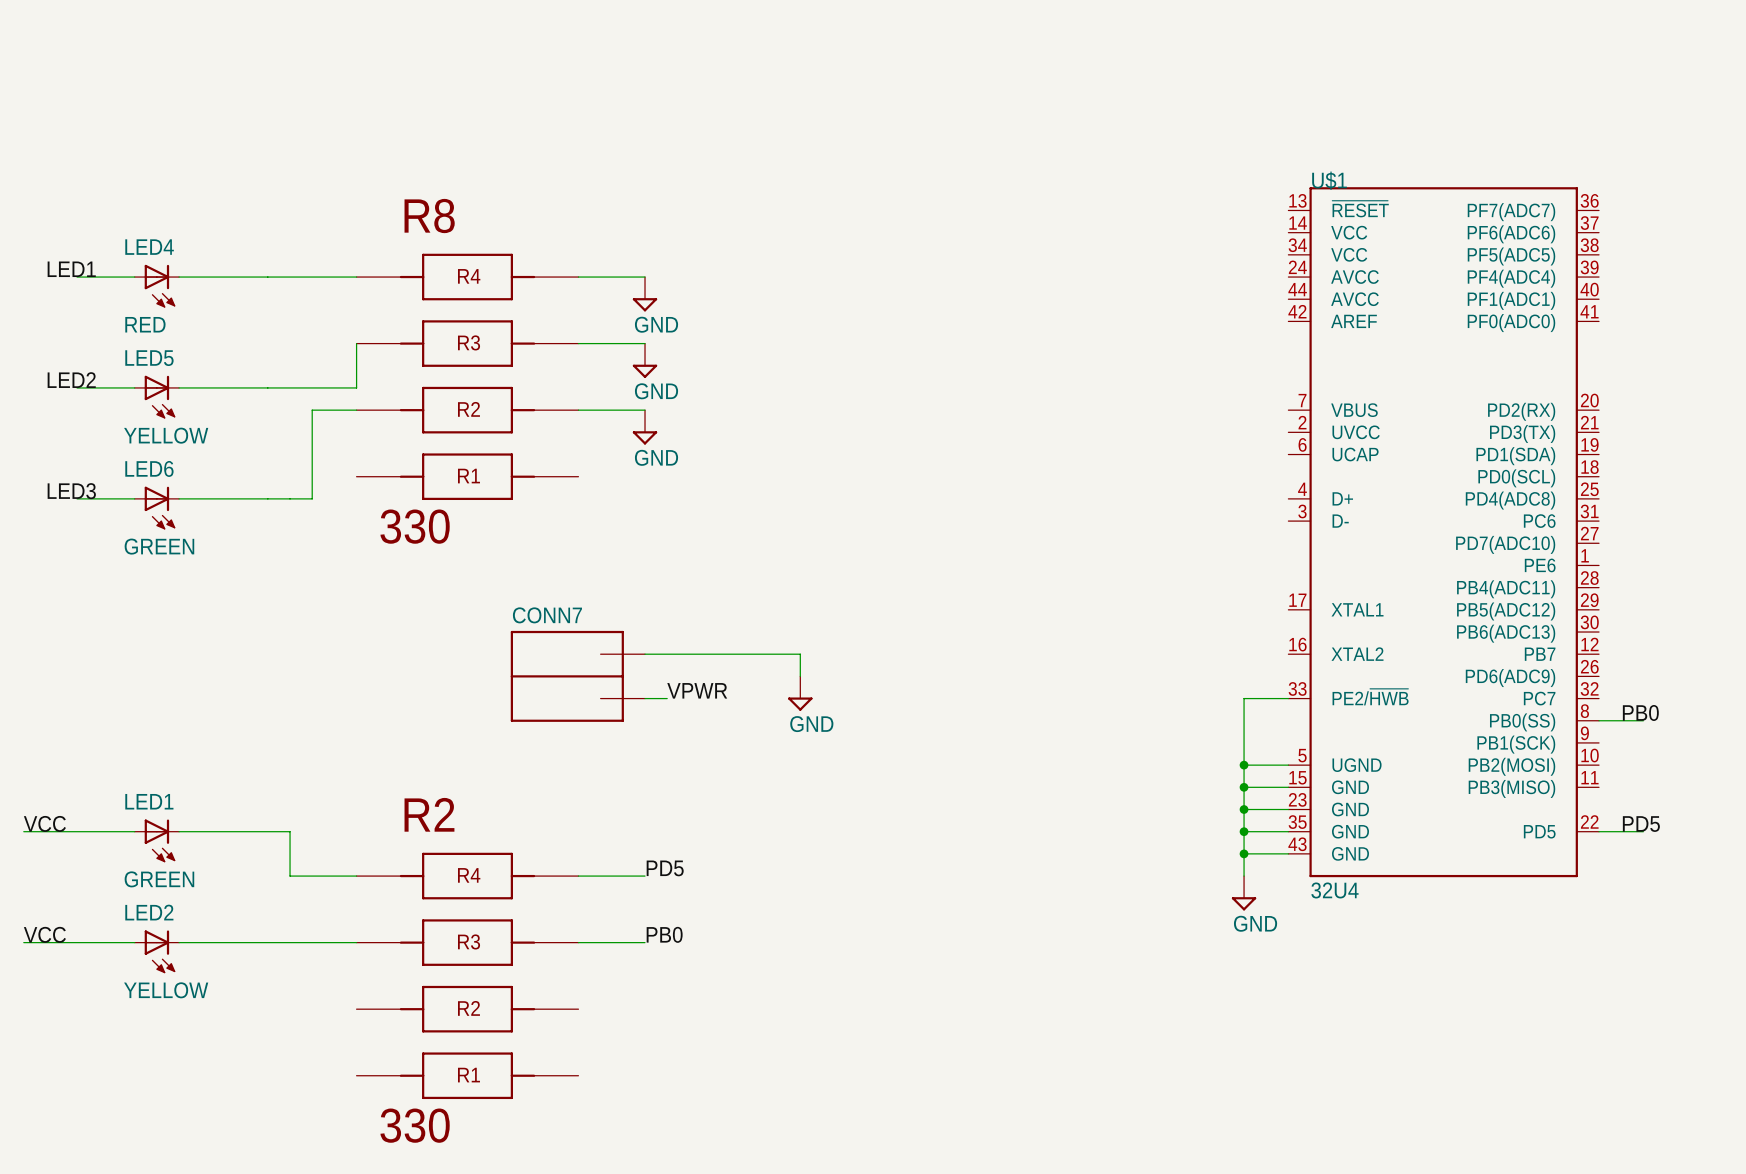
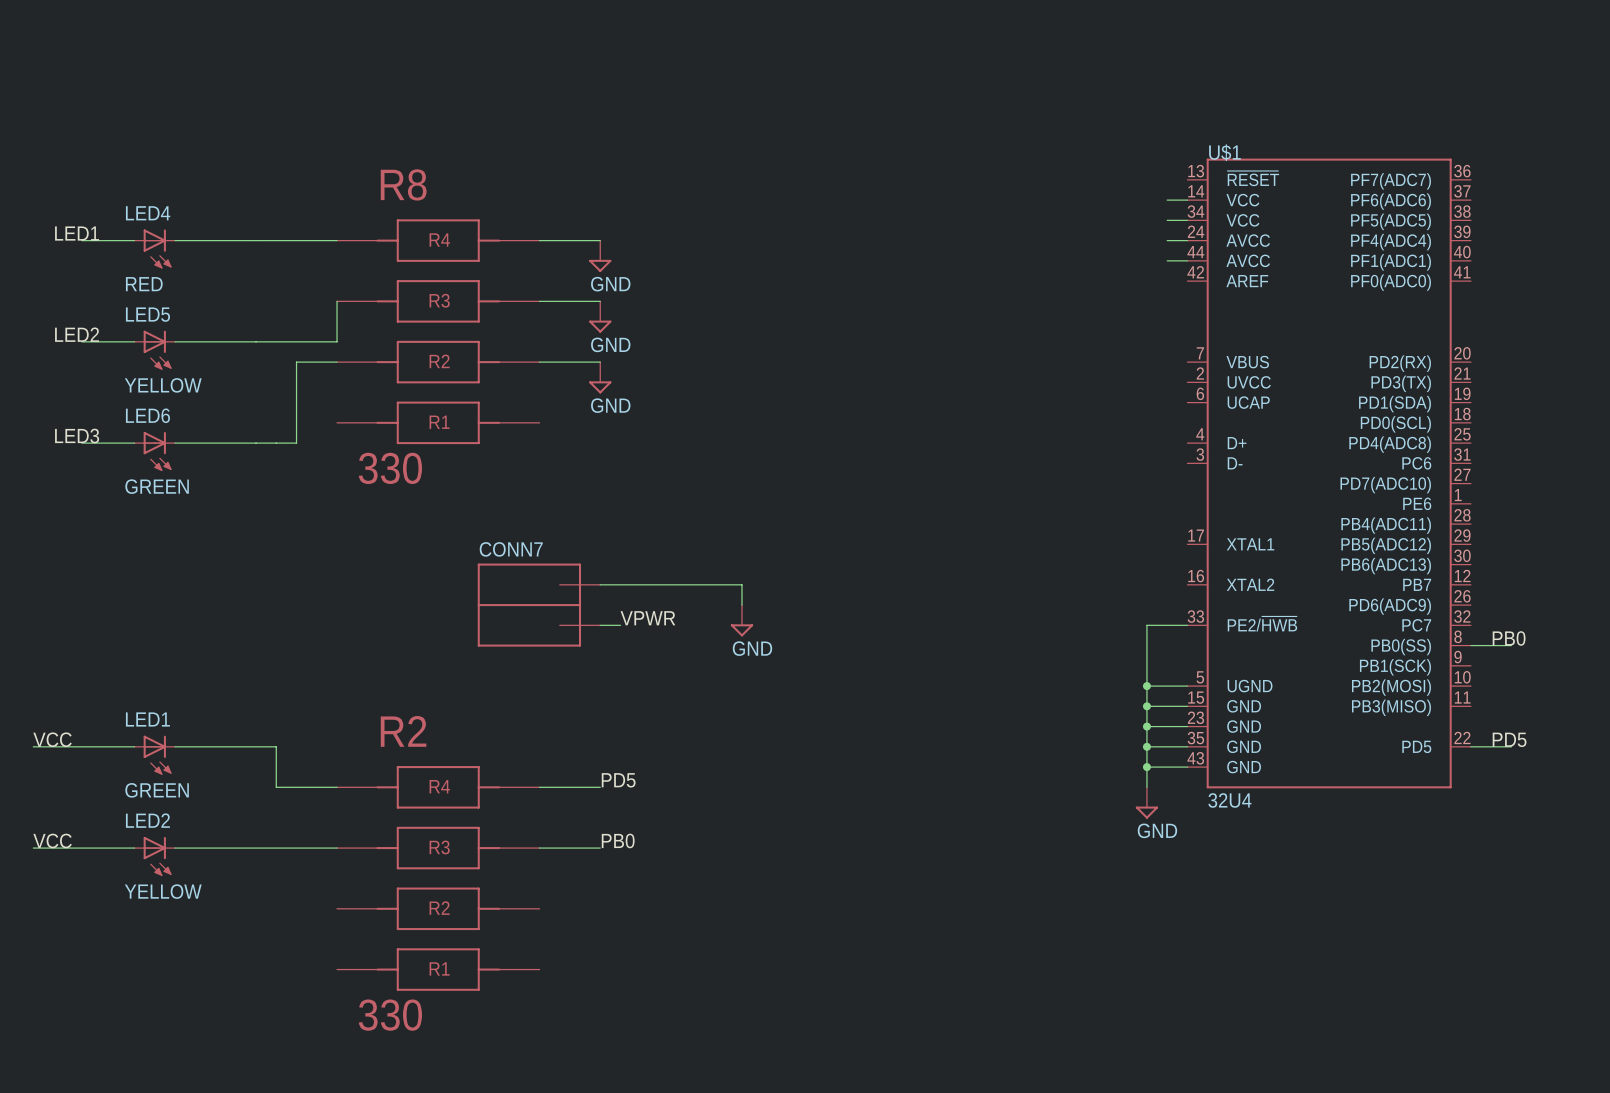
wire: none -> (1167, 200) (1187, 200)
wire: none -> (1167, 220) (1187, 220)
wire: none -> (1167, 240) (1187, 240)
wire: none -> (1167, 260) (1187, 260)

